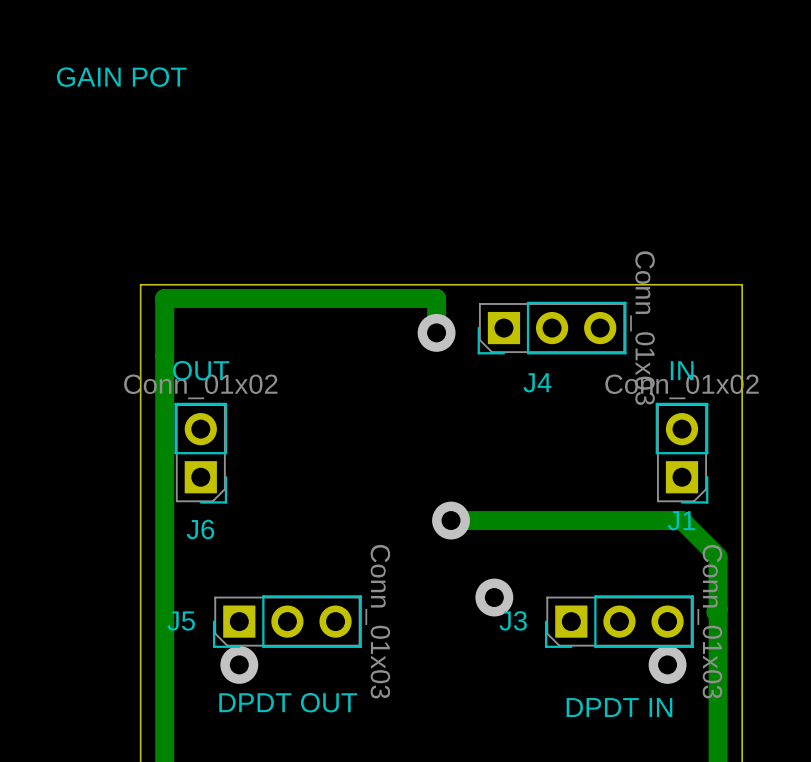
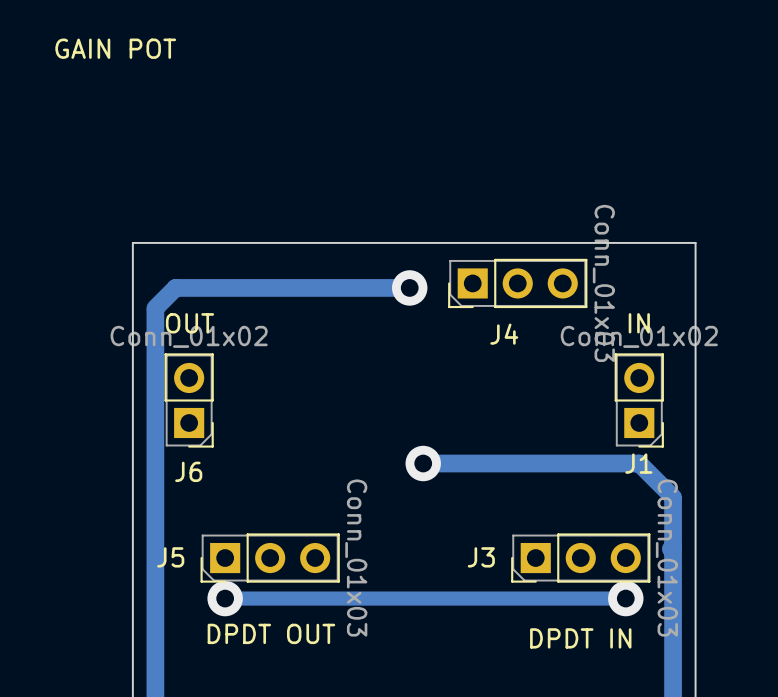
track: (436, 332) (436, 298) (164, 298) (164, 354) -> (409, 287) (175, 287) (155, 308)
via: (494, 597) -> none
track: none -> (625, 598) (225, 598)

